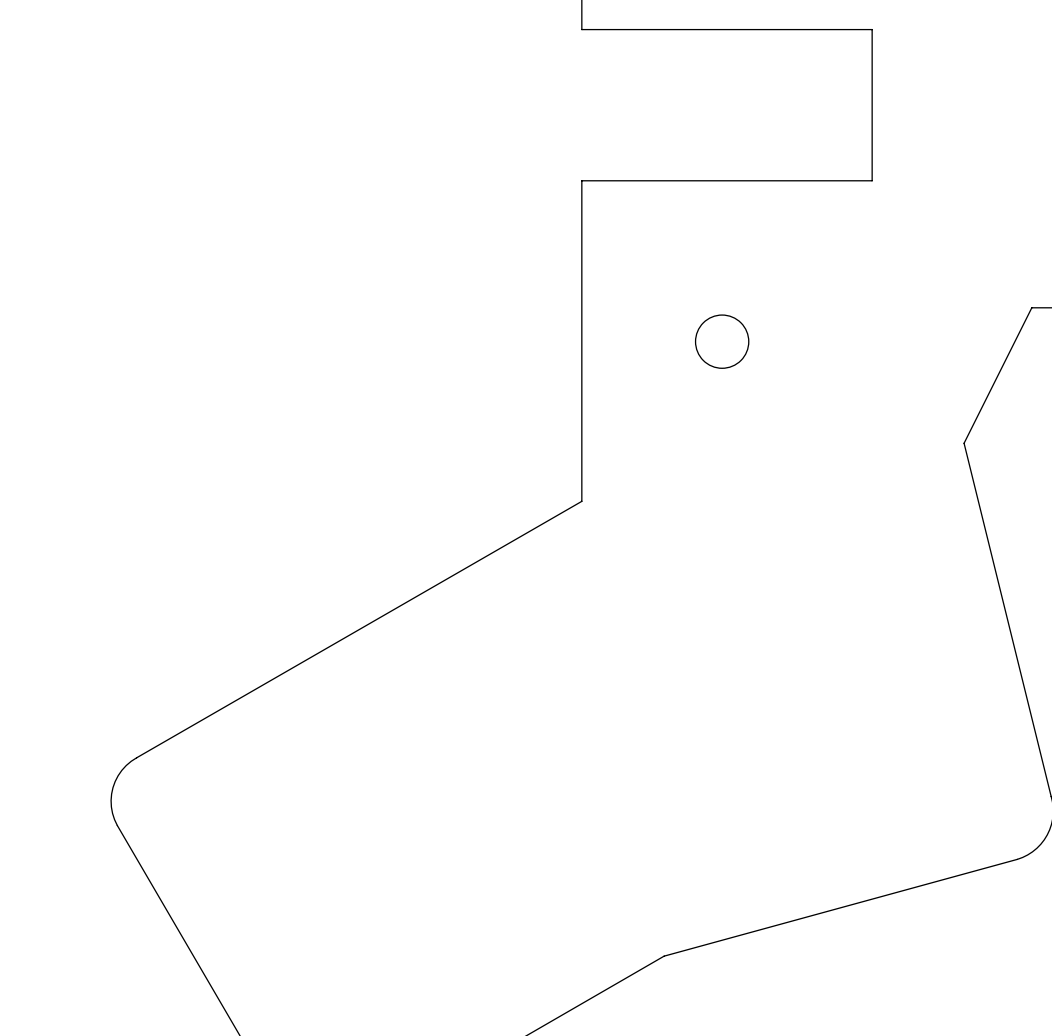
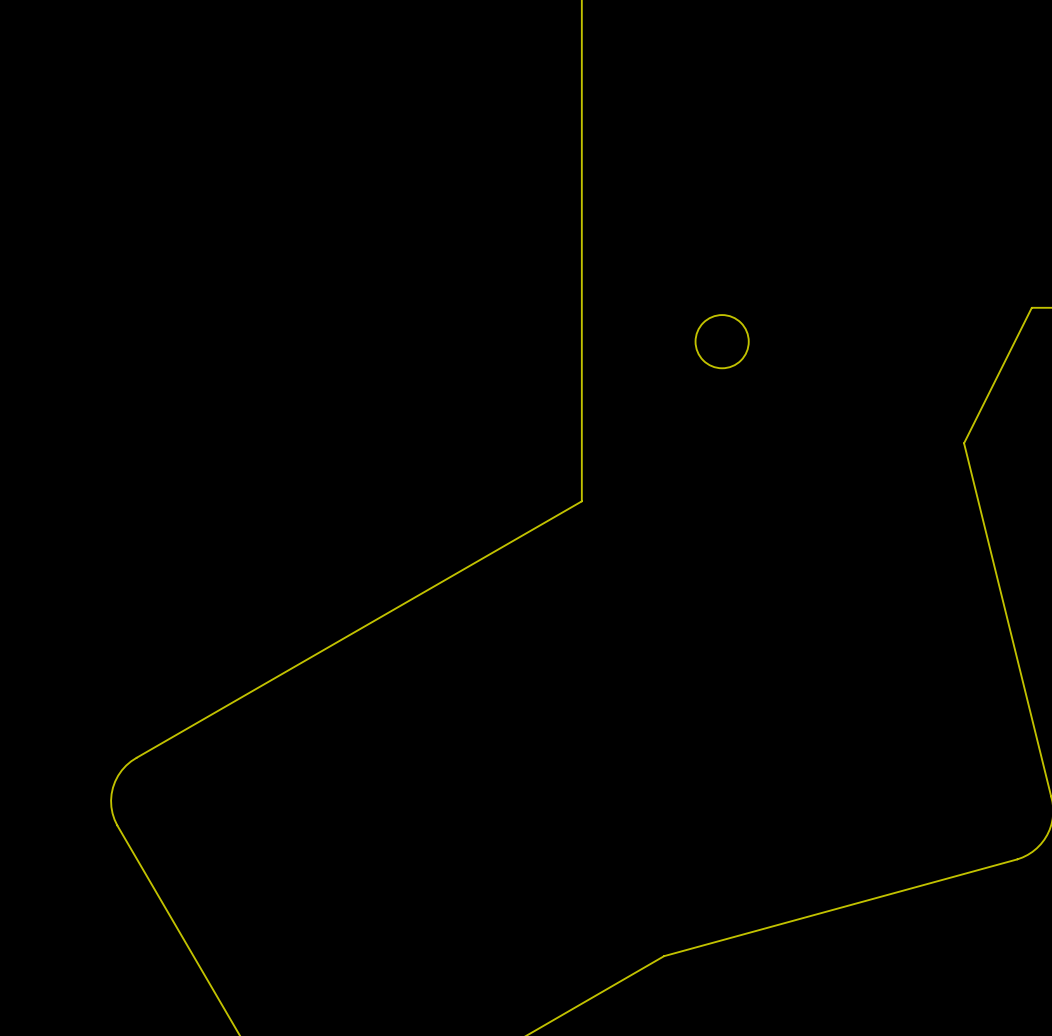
board edge: (581, 29) (872, 29) (872, 180) (581, 180) -> (581, 29) (581, 180)

